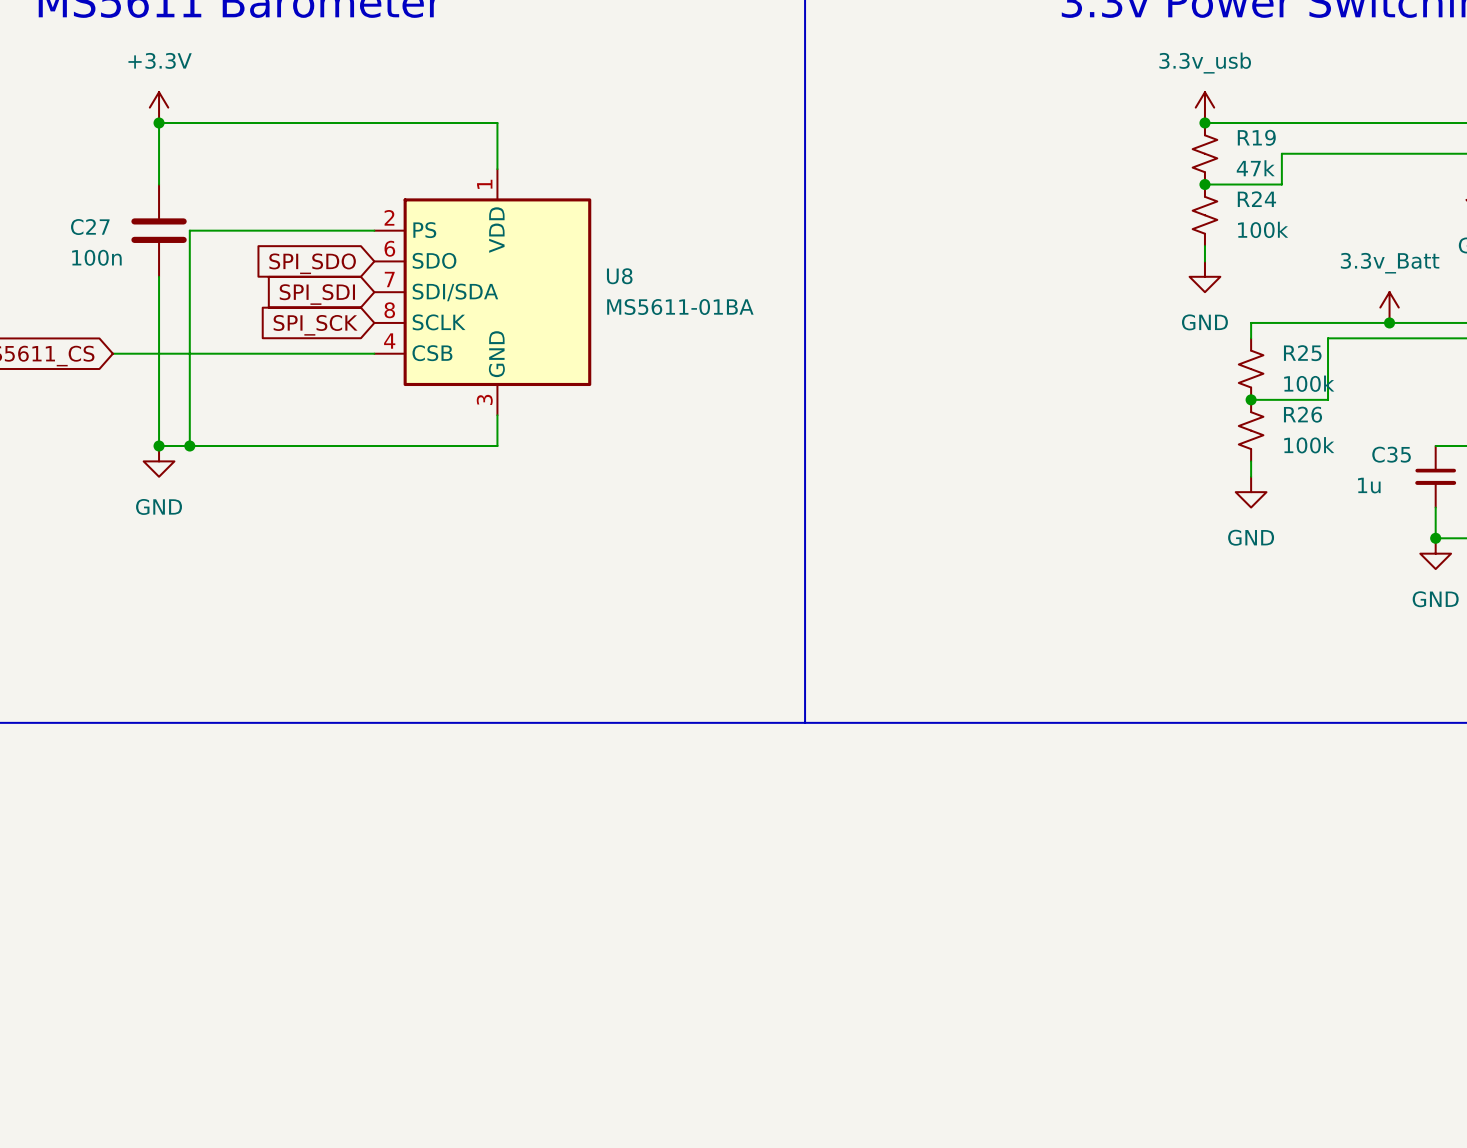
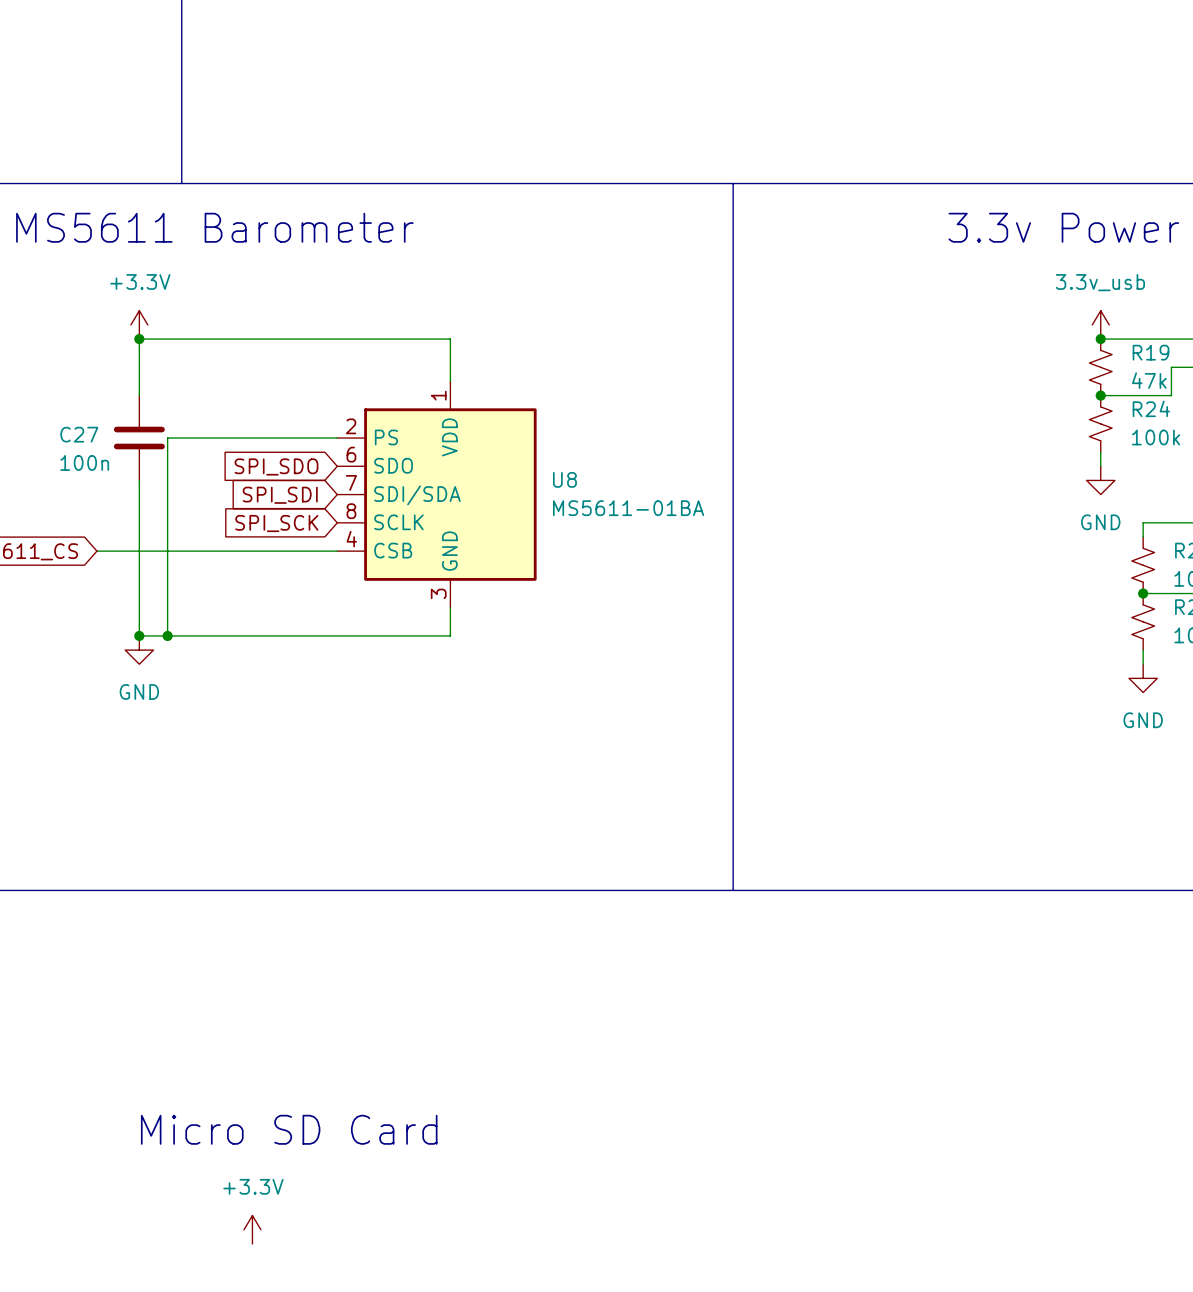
text: none -> Micro SD Card (289, 1129)
power symbol: none -> +3.3V (252, 1229)

